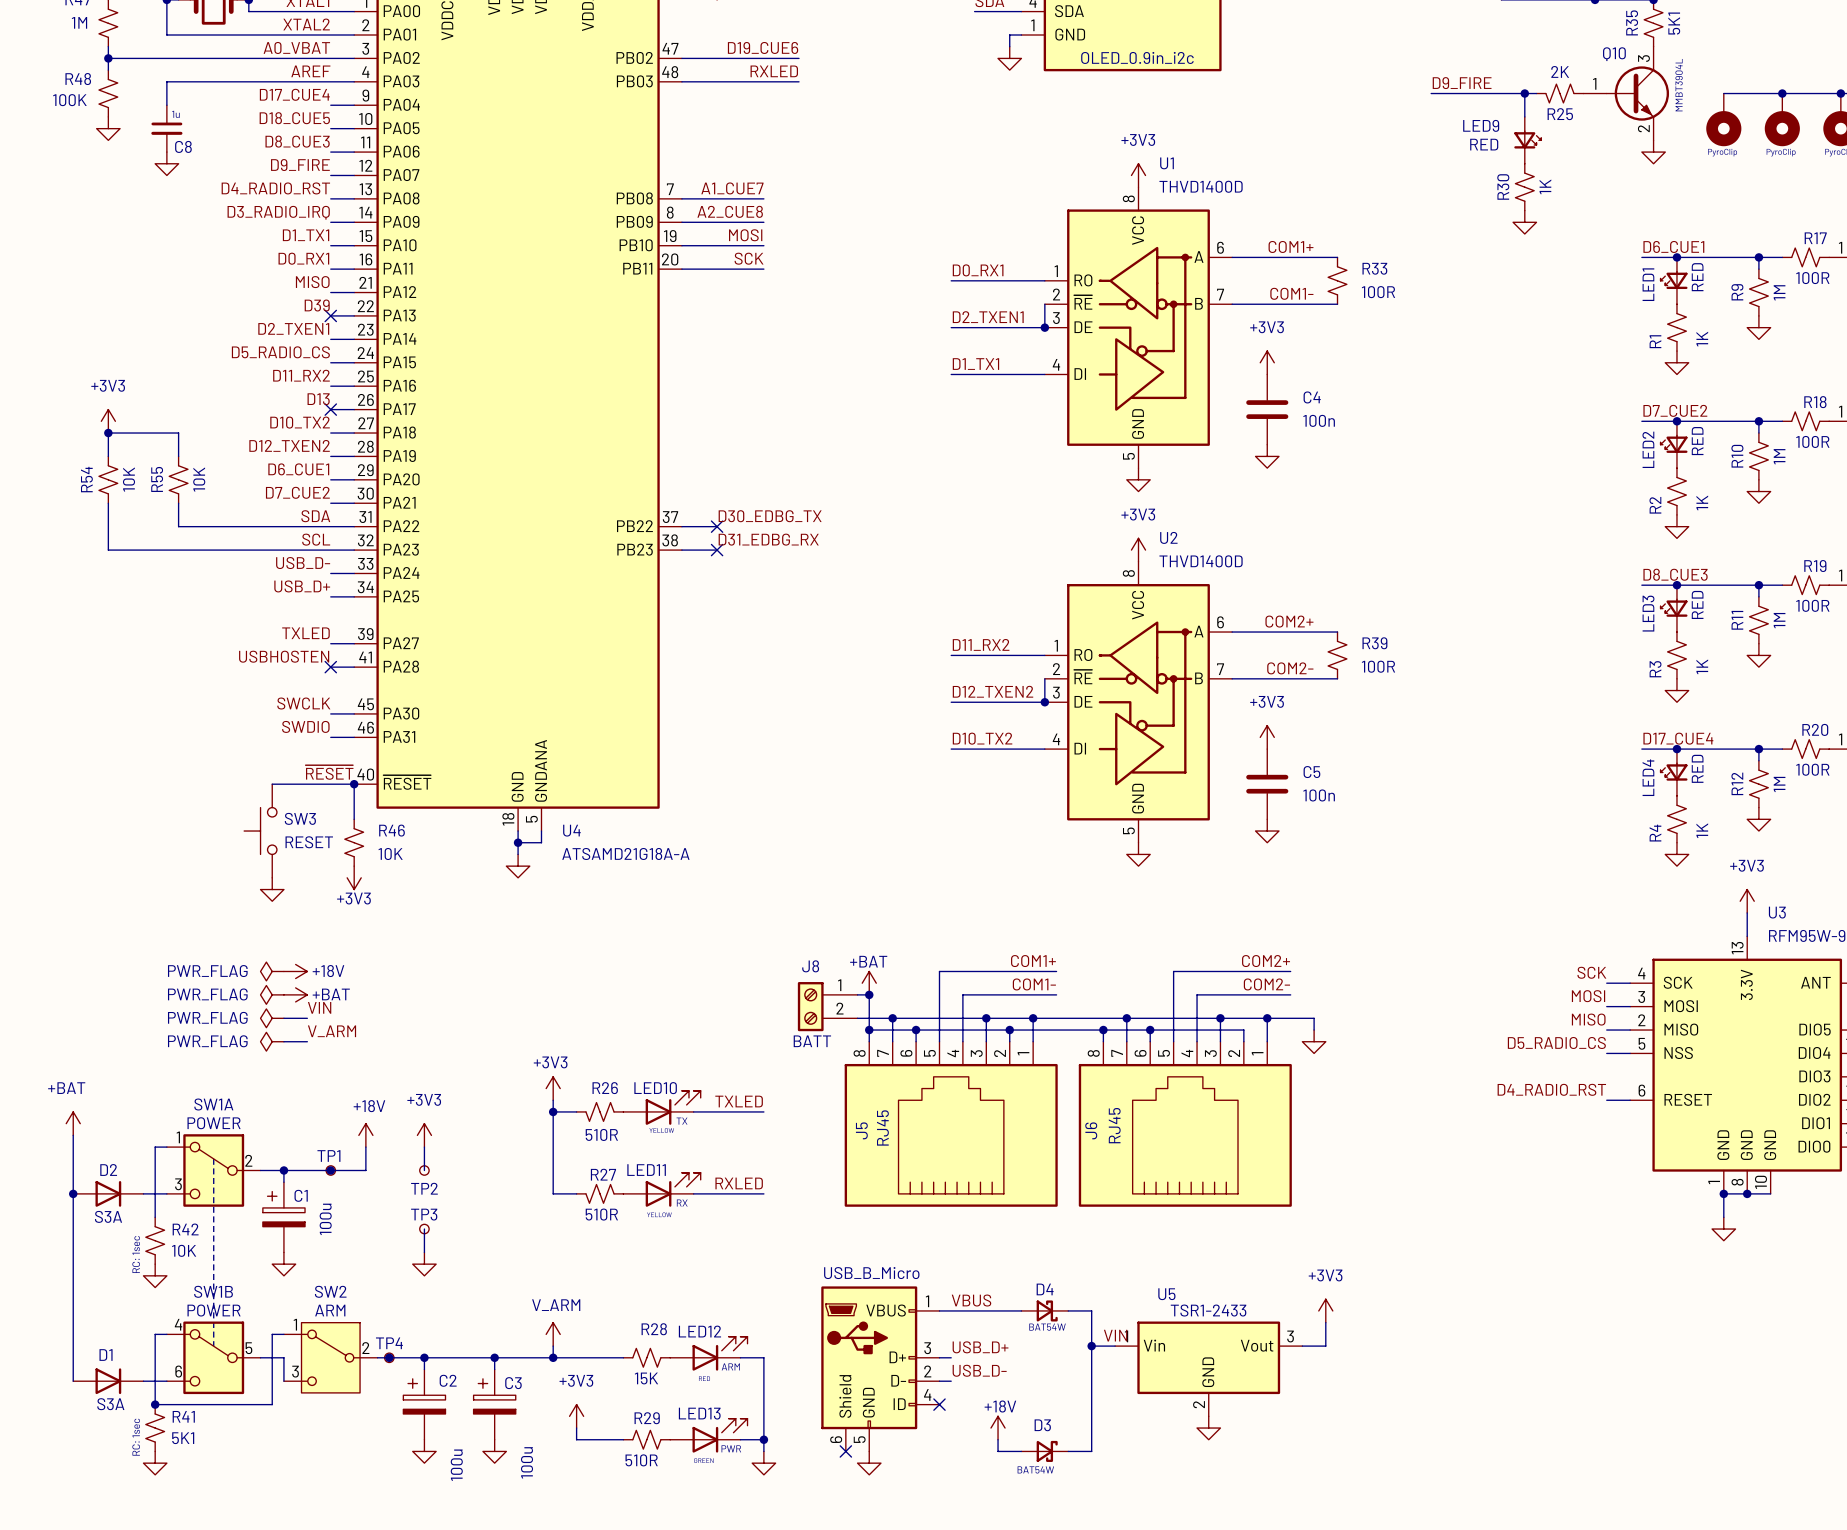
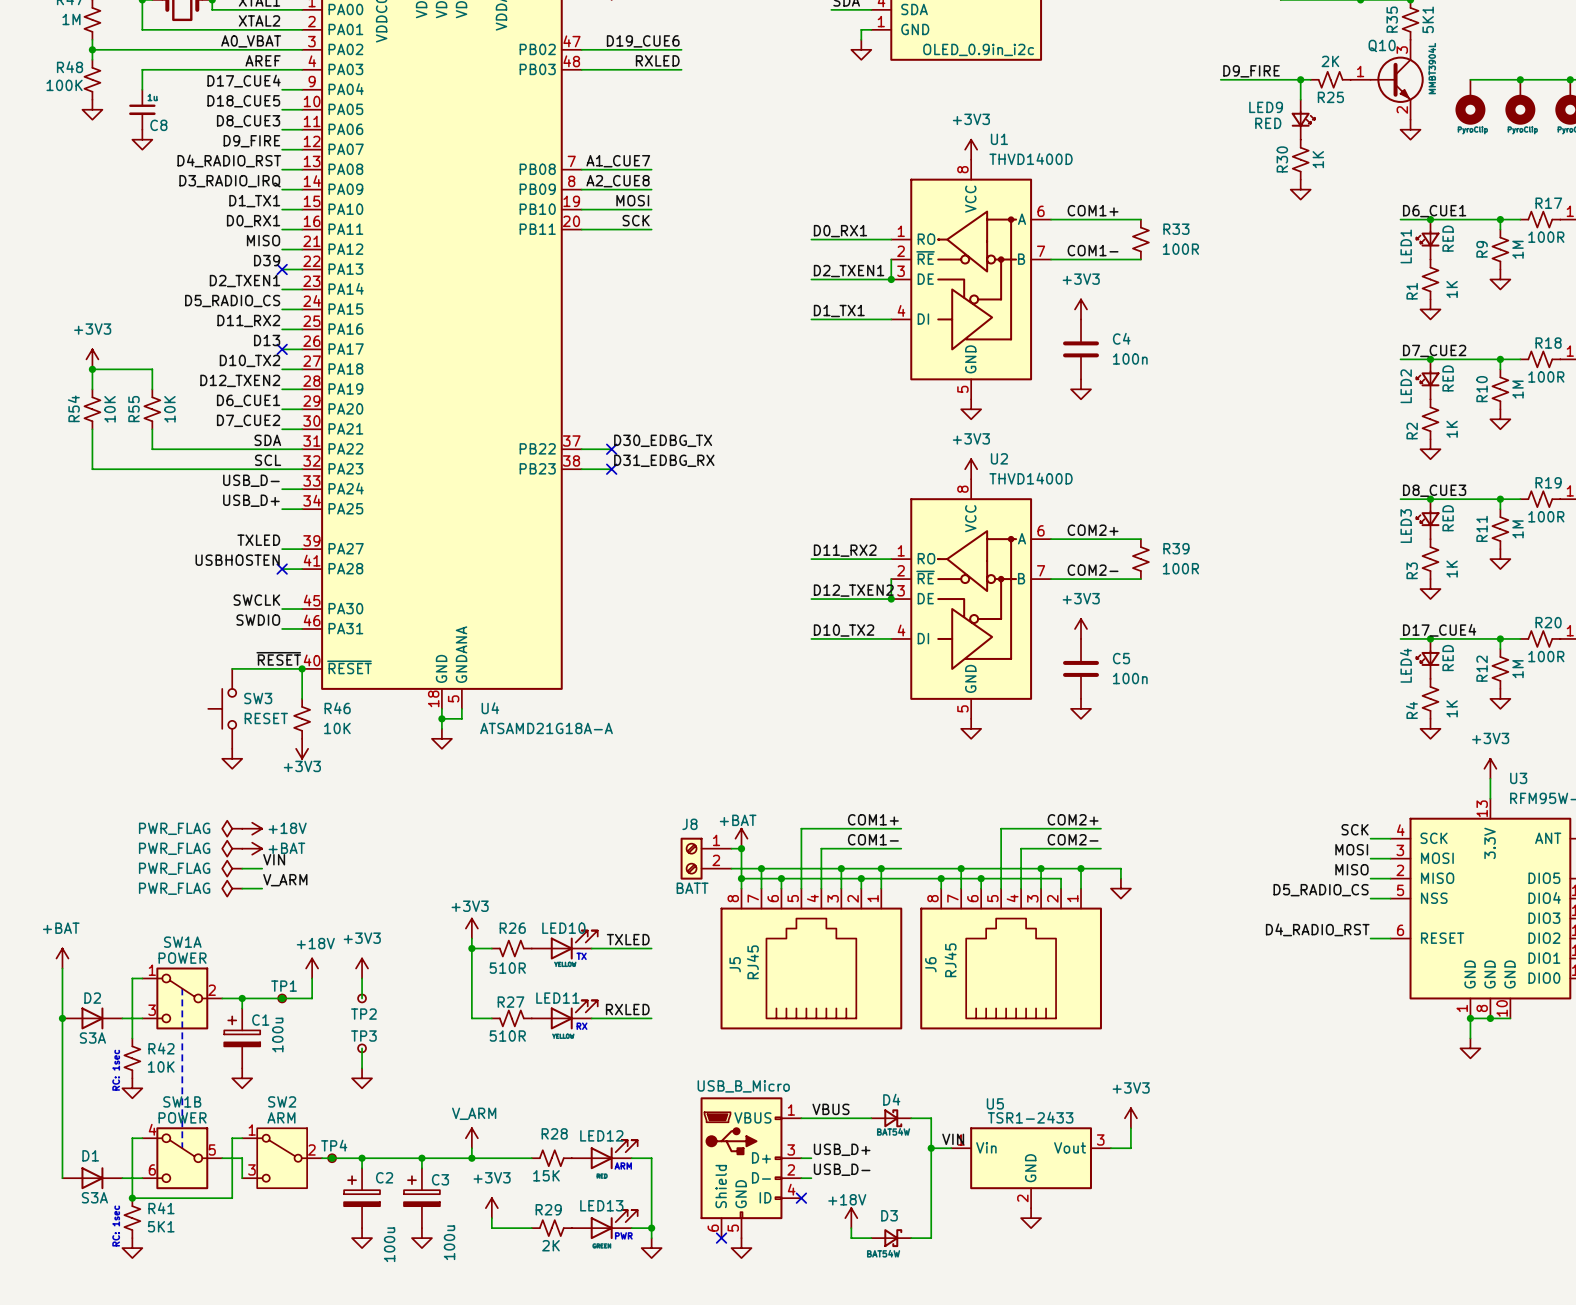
R29 value: 510R (641, 1460) -> 2K (550, 1245)

